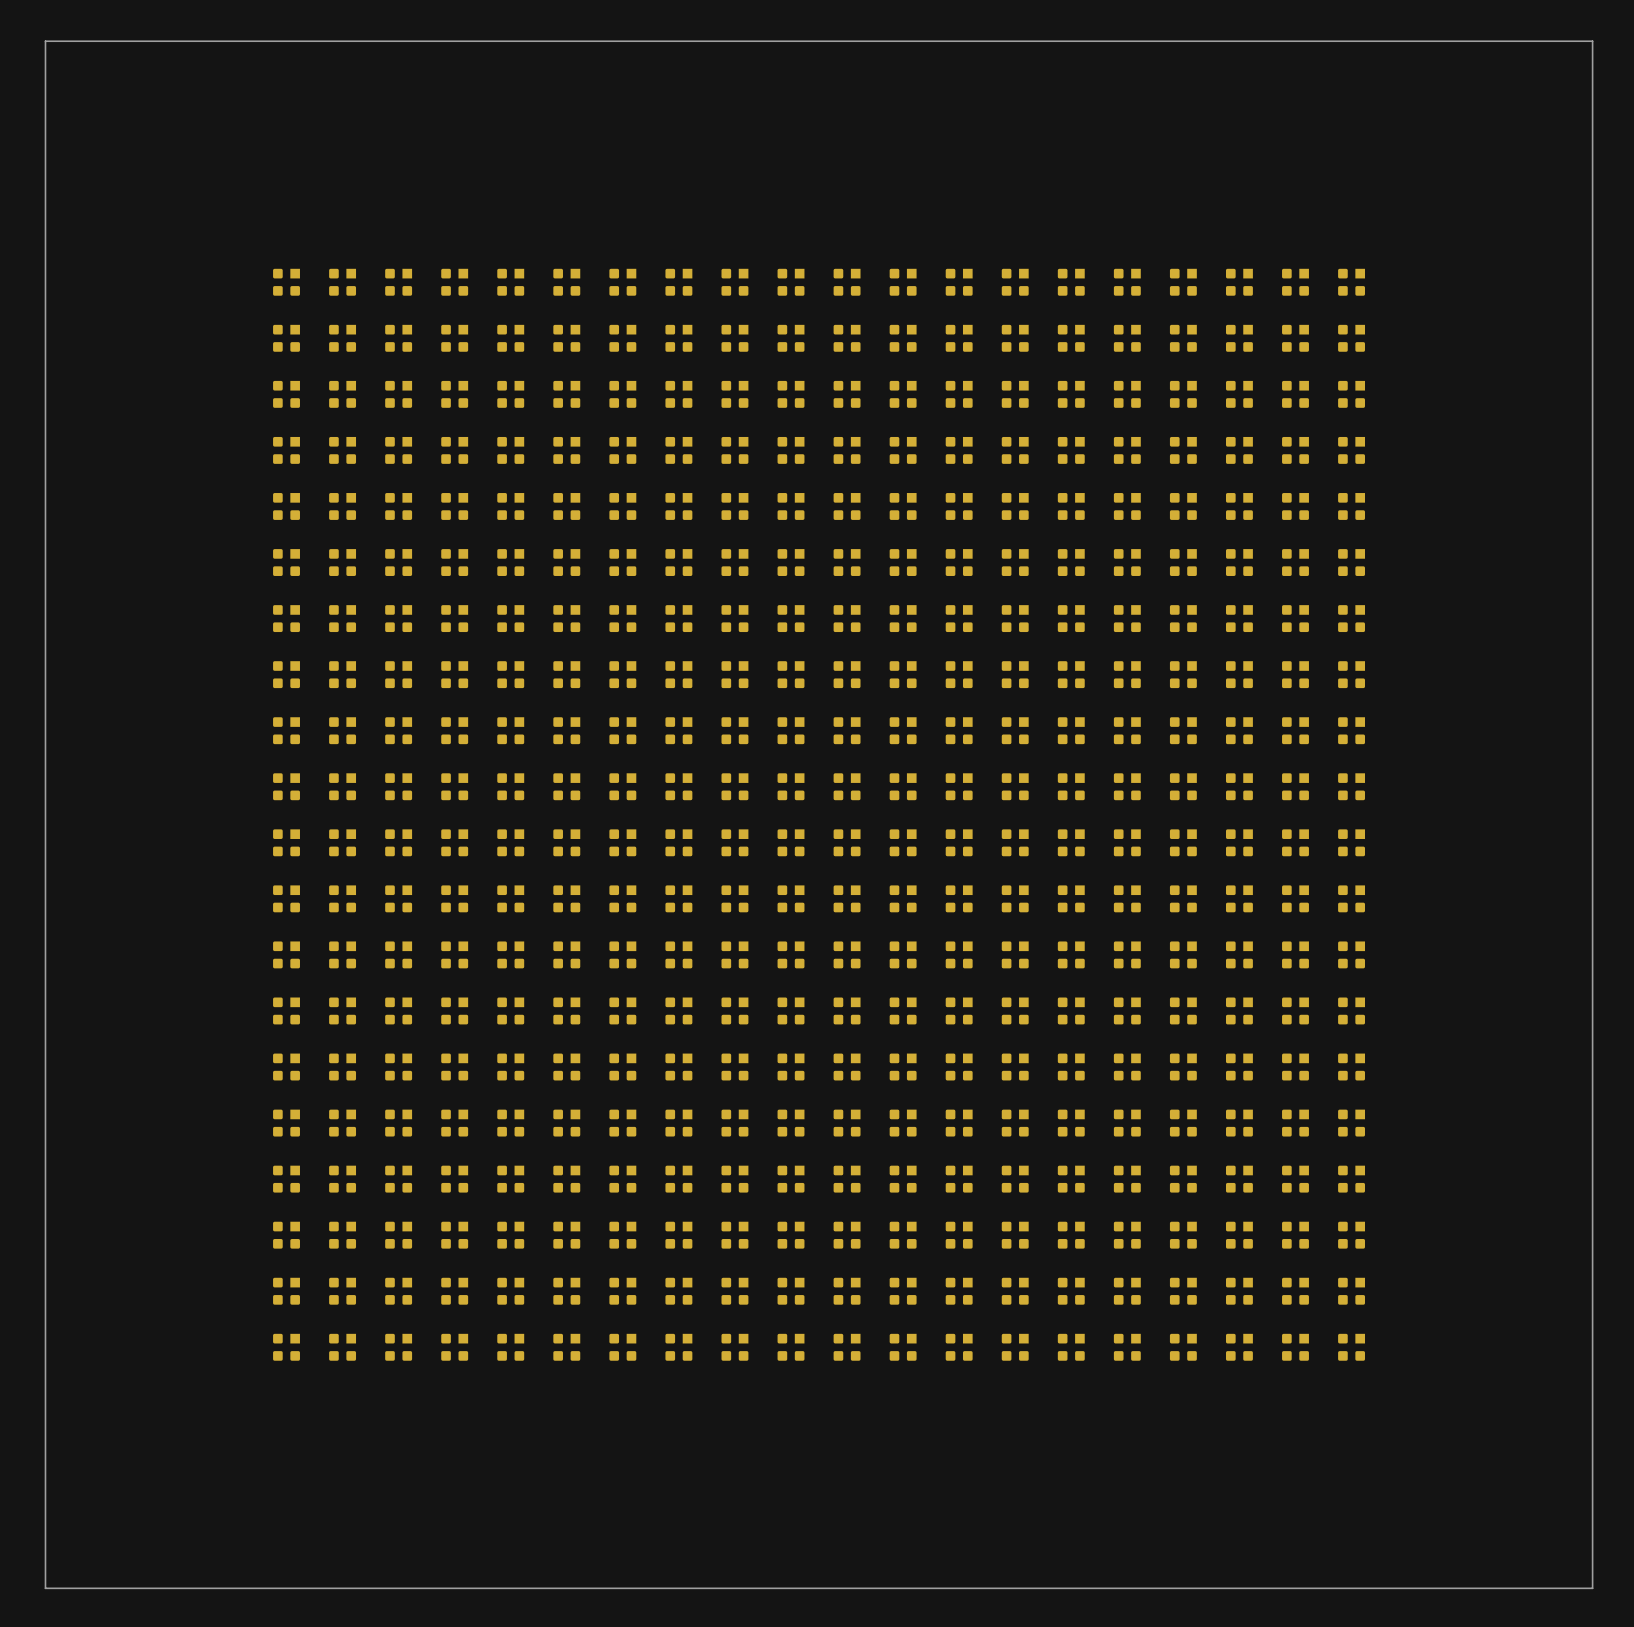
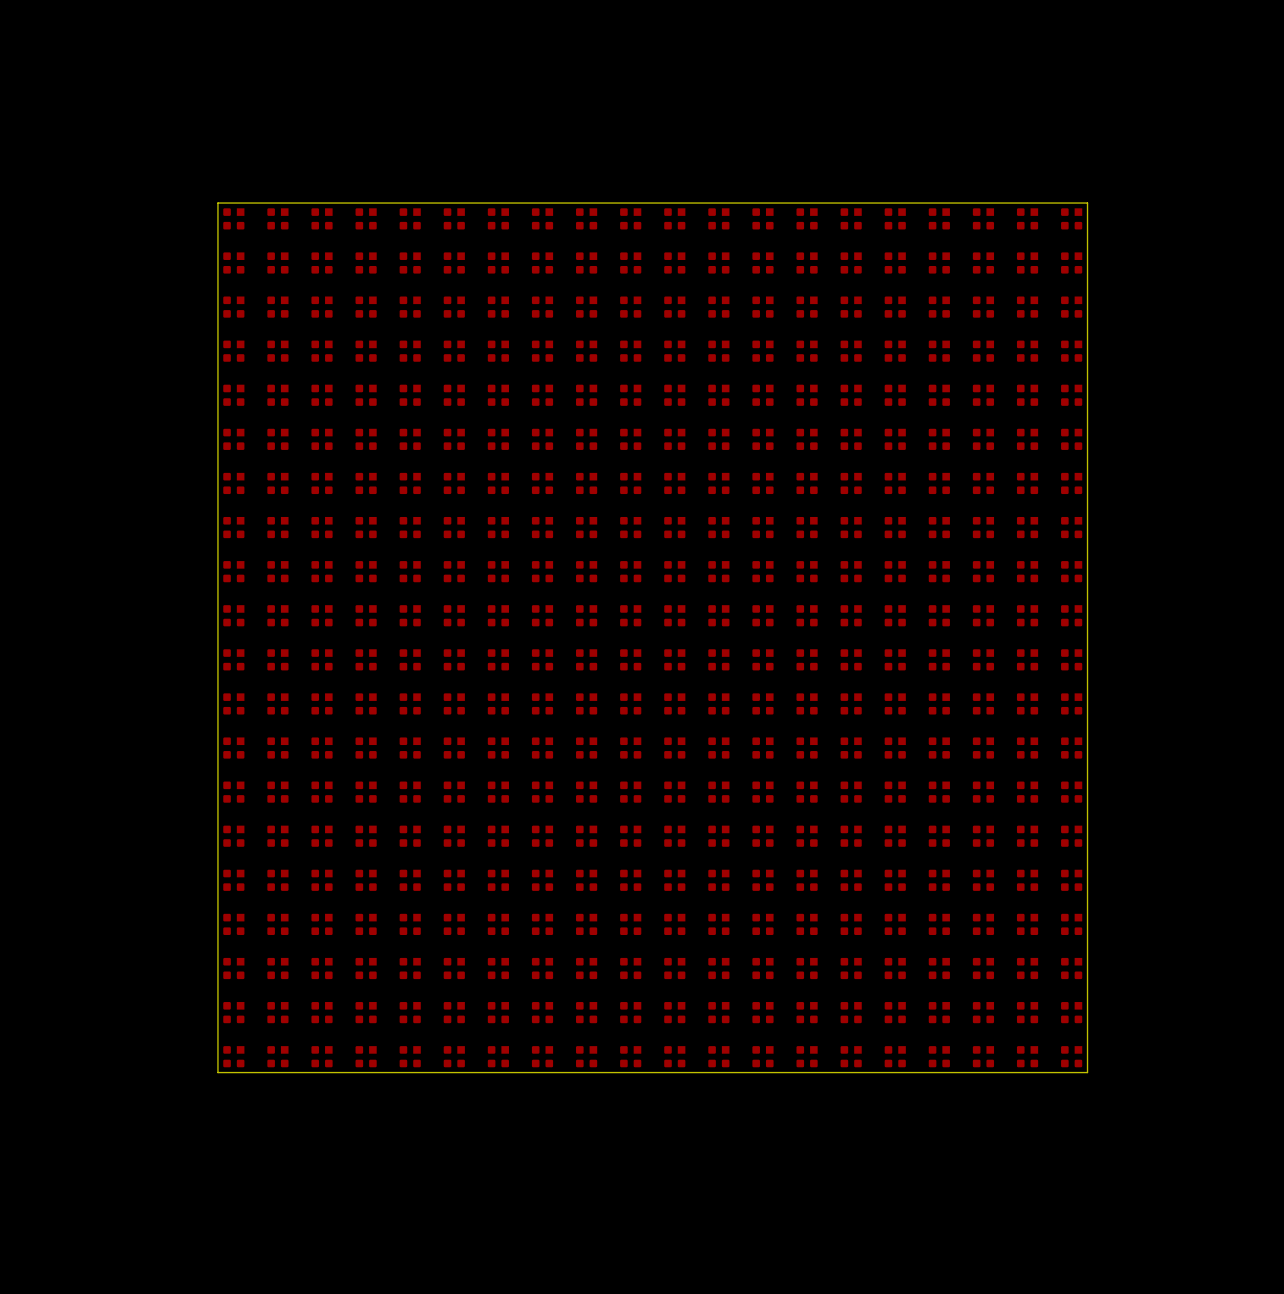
board edge: (45, 41) (1592, 41) (1592, 1588) (45, 1588) (45, 41) -> (217, 203) (217, 1072) (1087, 1072) (1087, 203) (217, 203)

